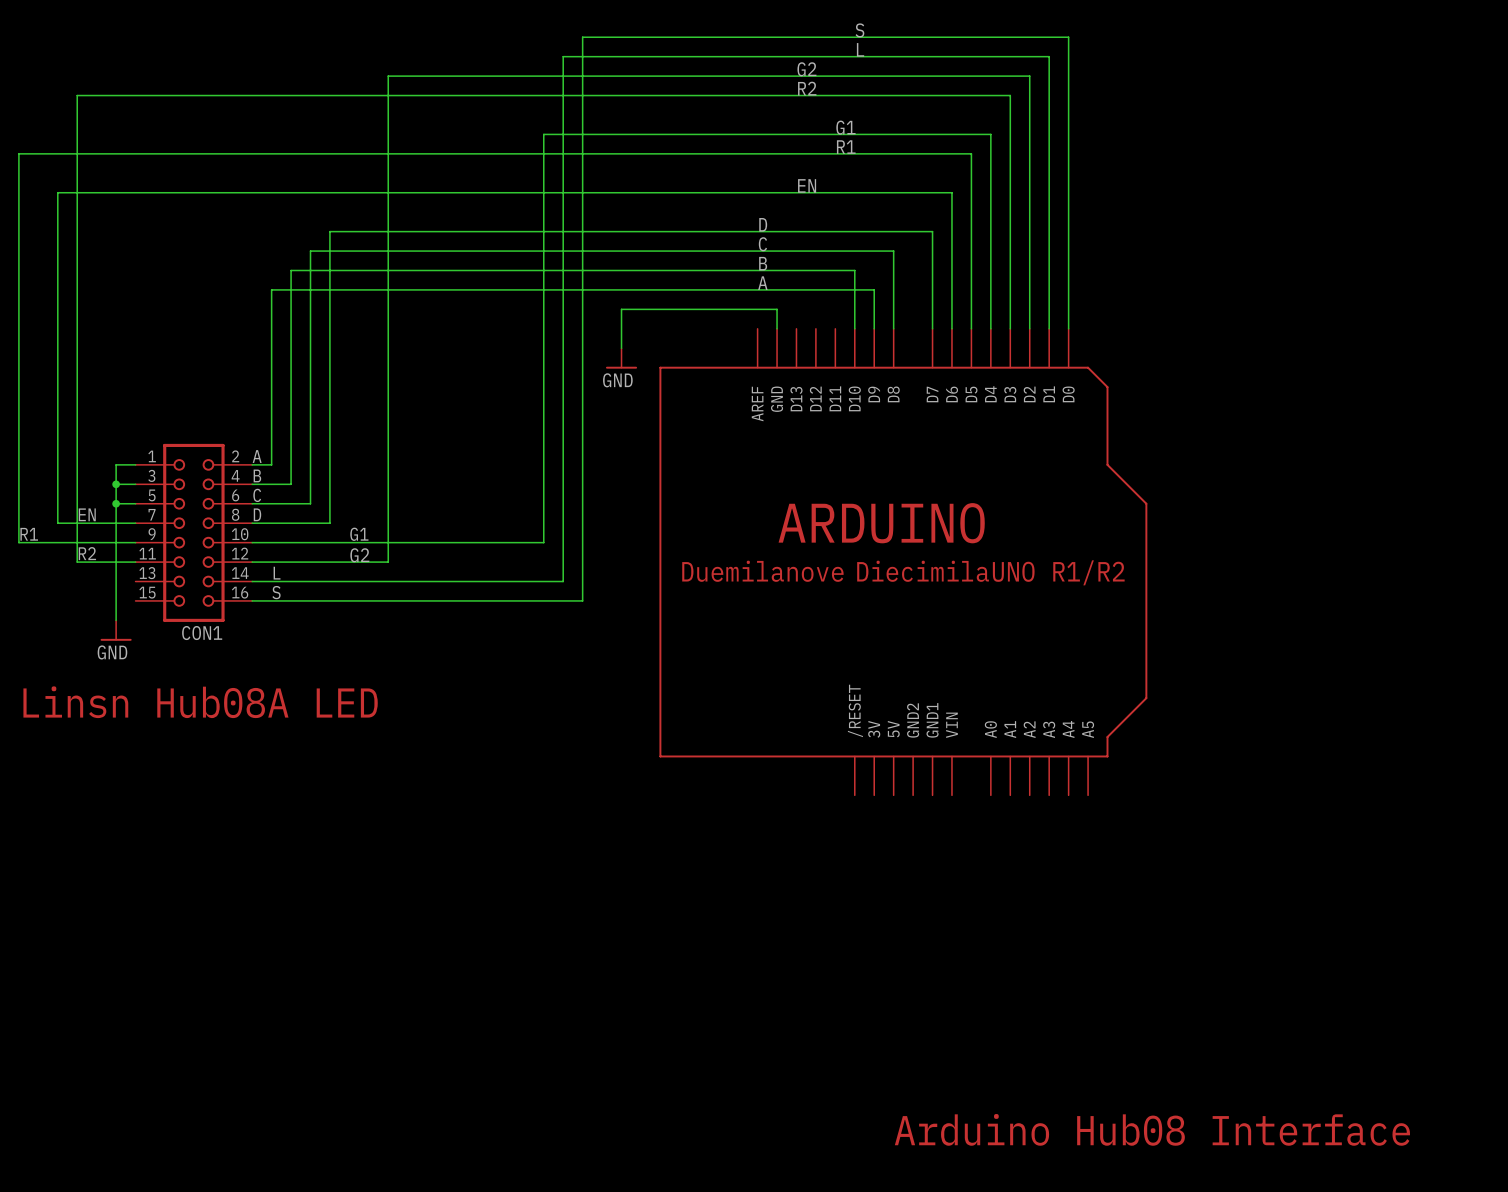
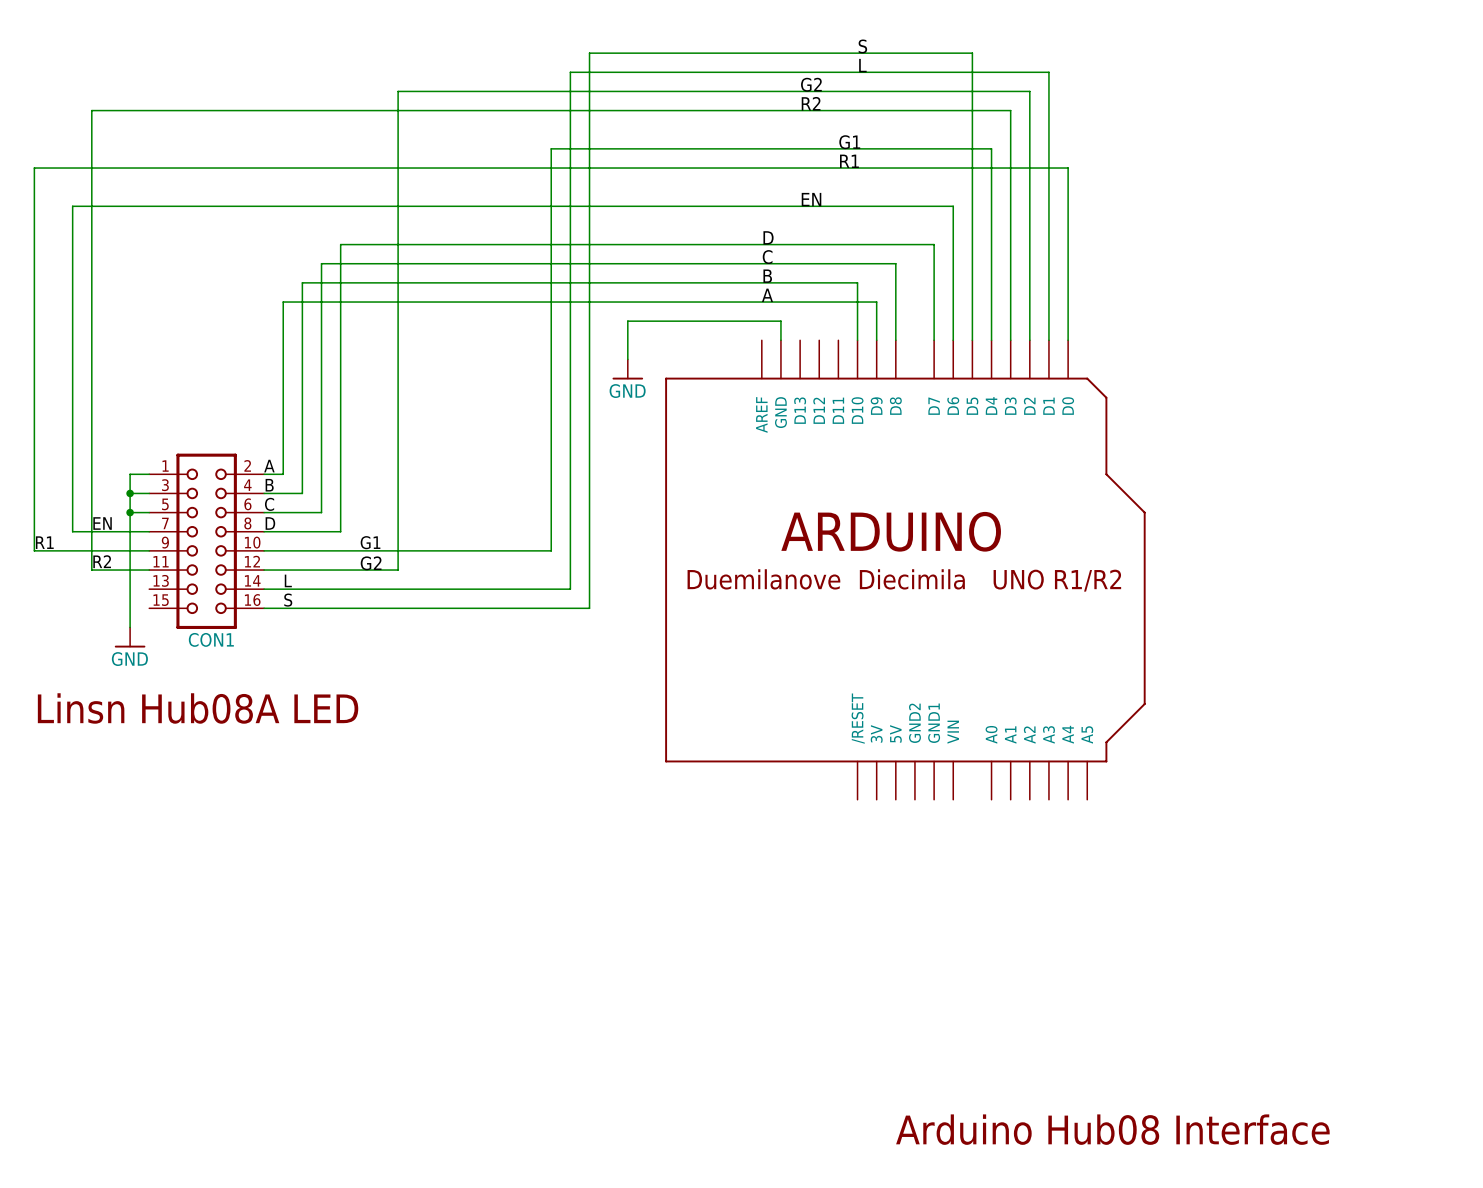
wire: (971, 37) (1068, 37) (1068, 153) -> (972, 53) (972, 168) (1068, 168)

